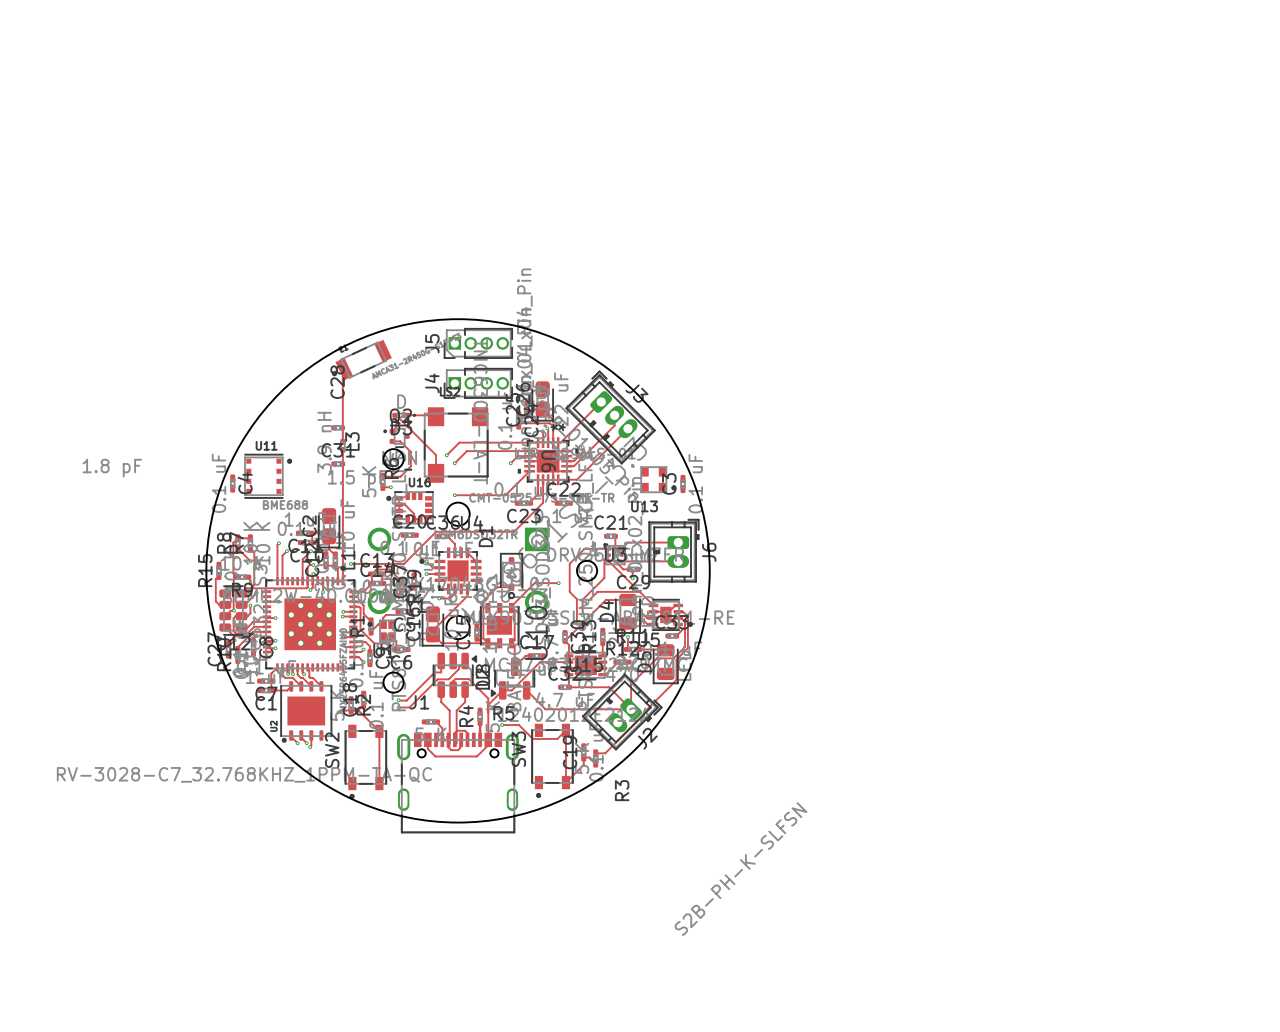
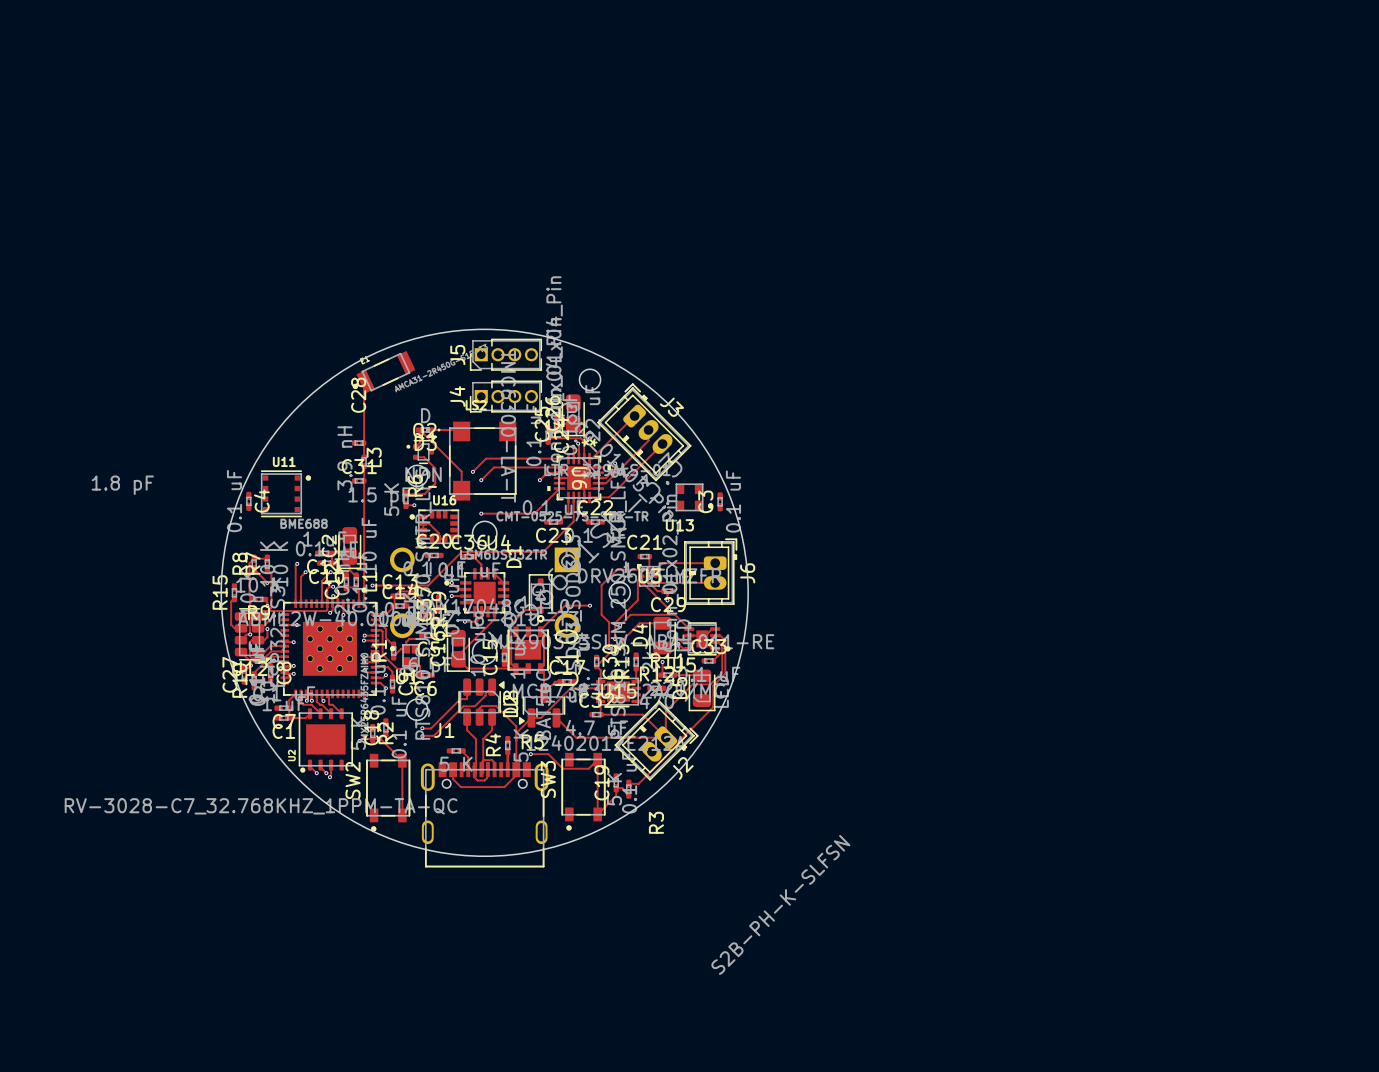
round board edge: none -> [579, 368, 601, 391]

